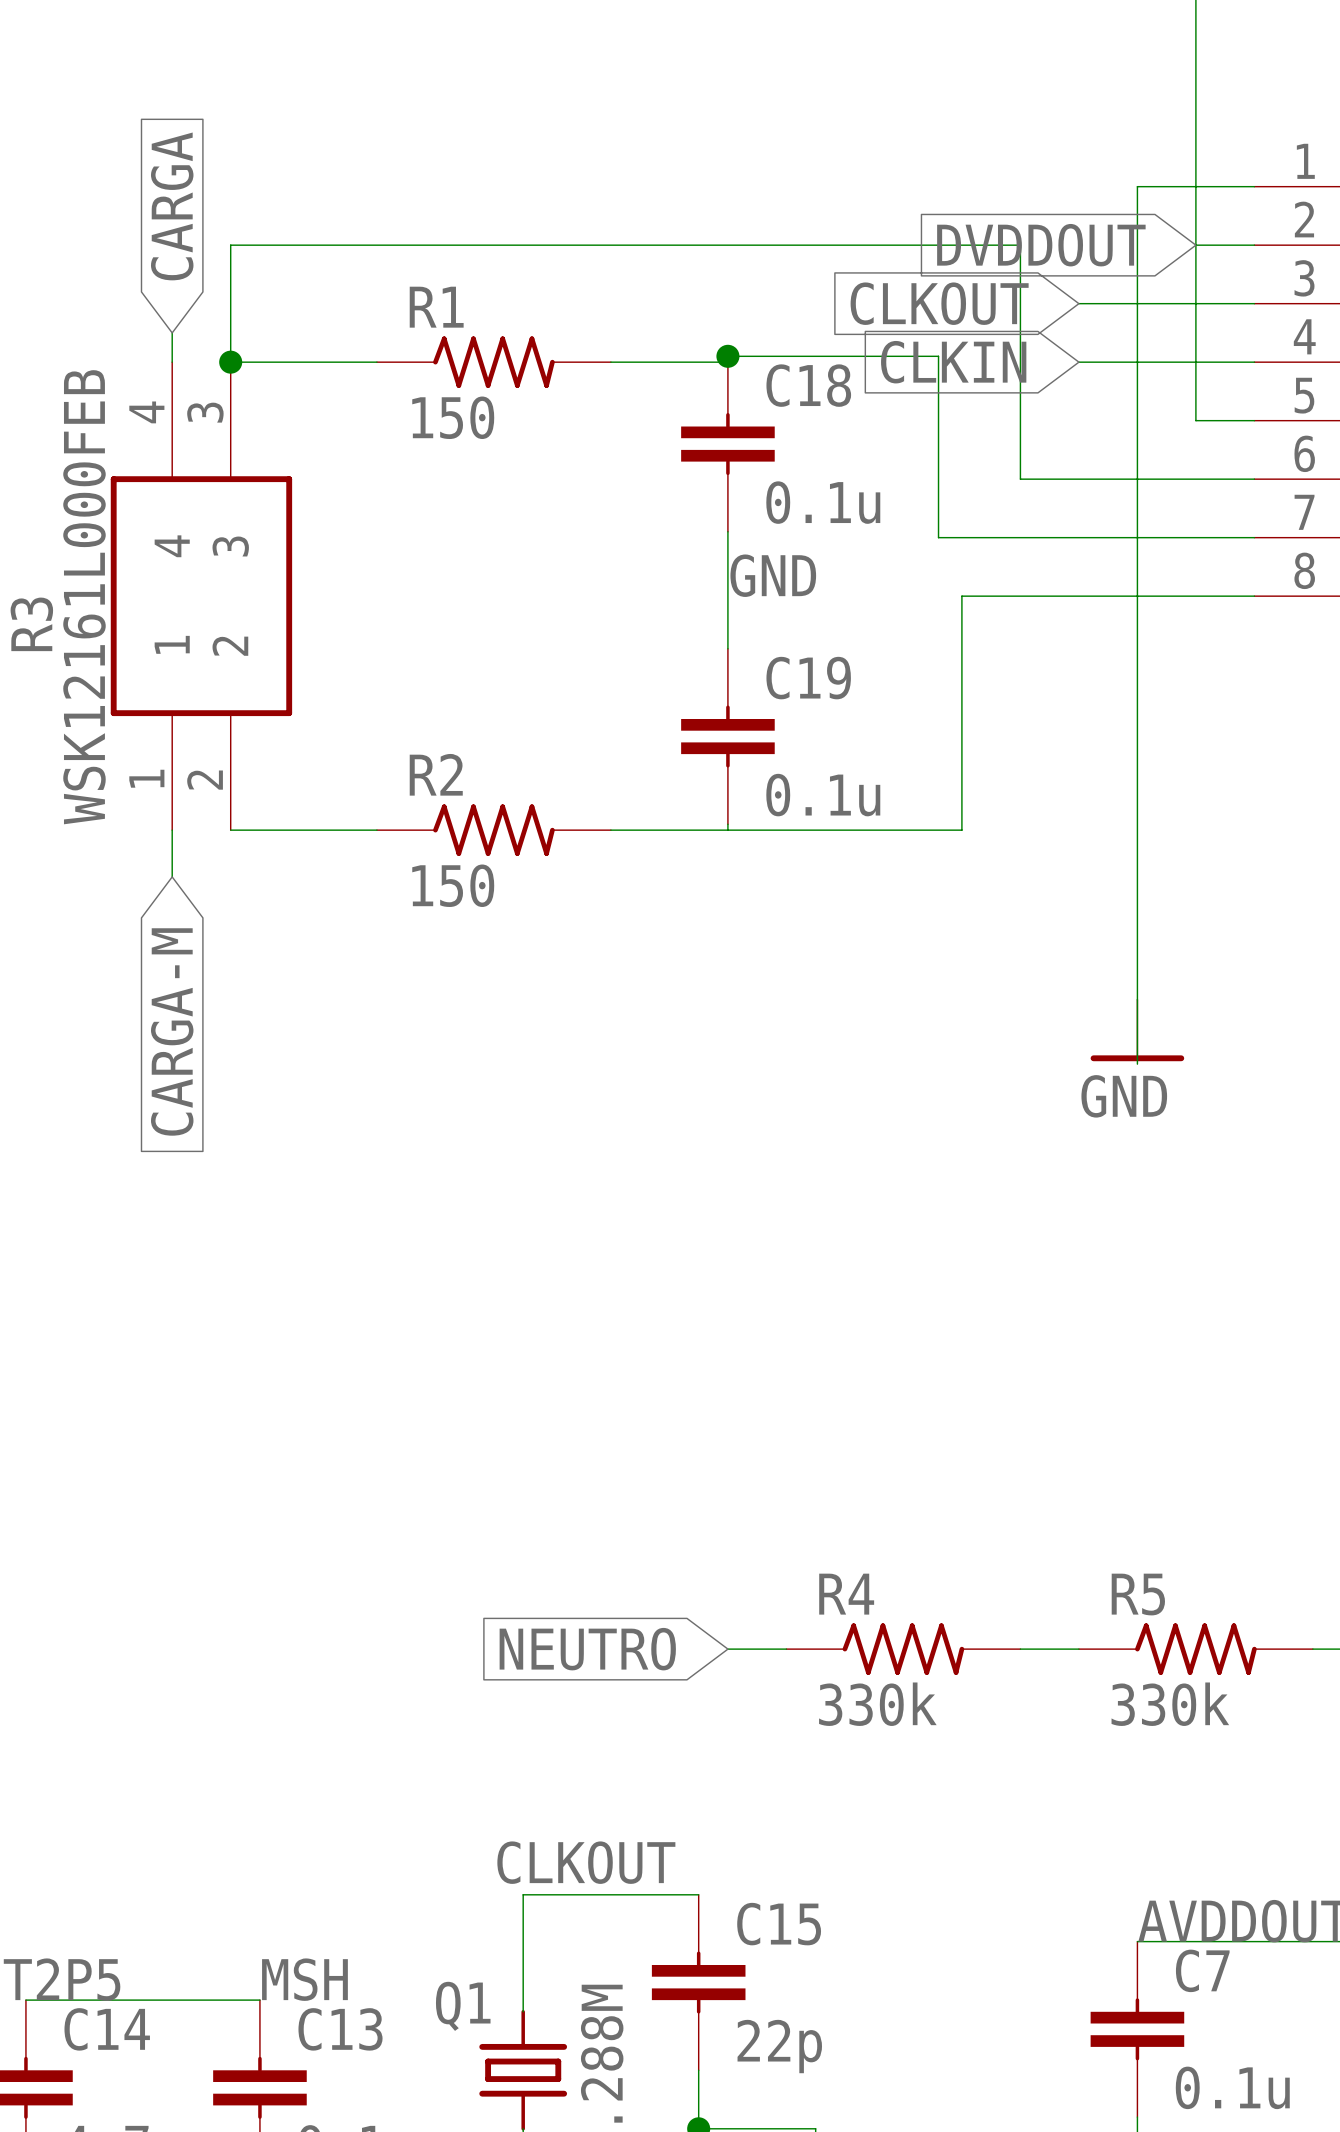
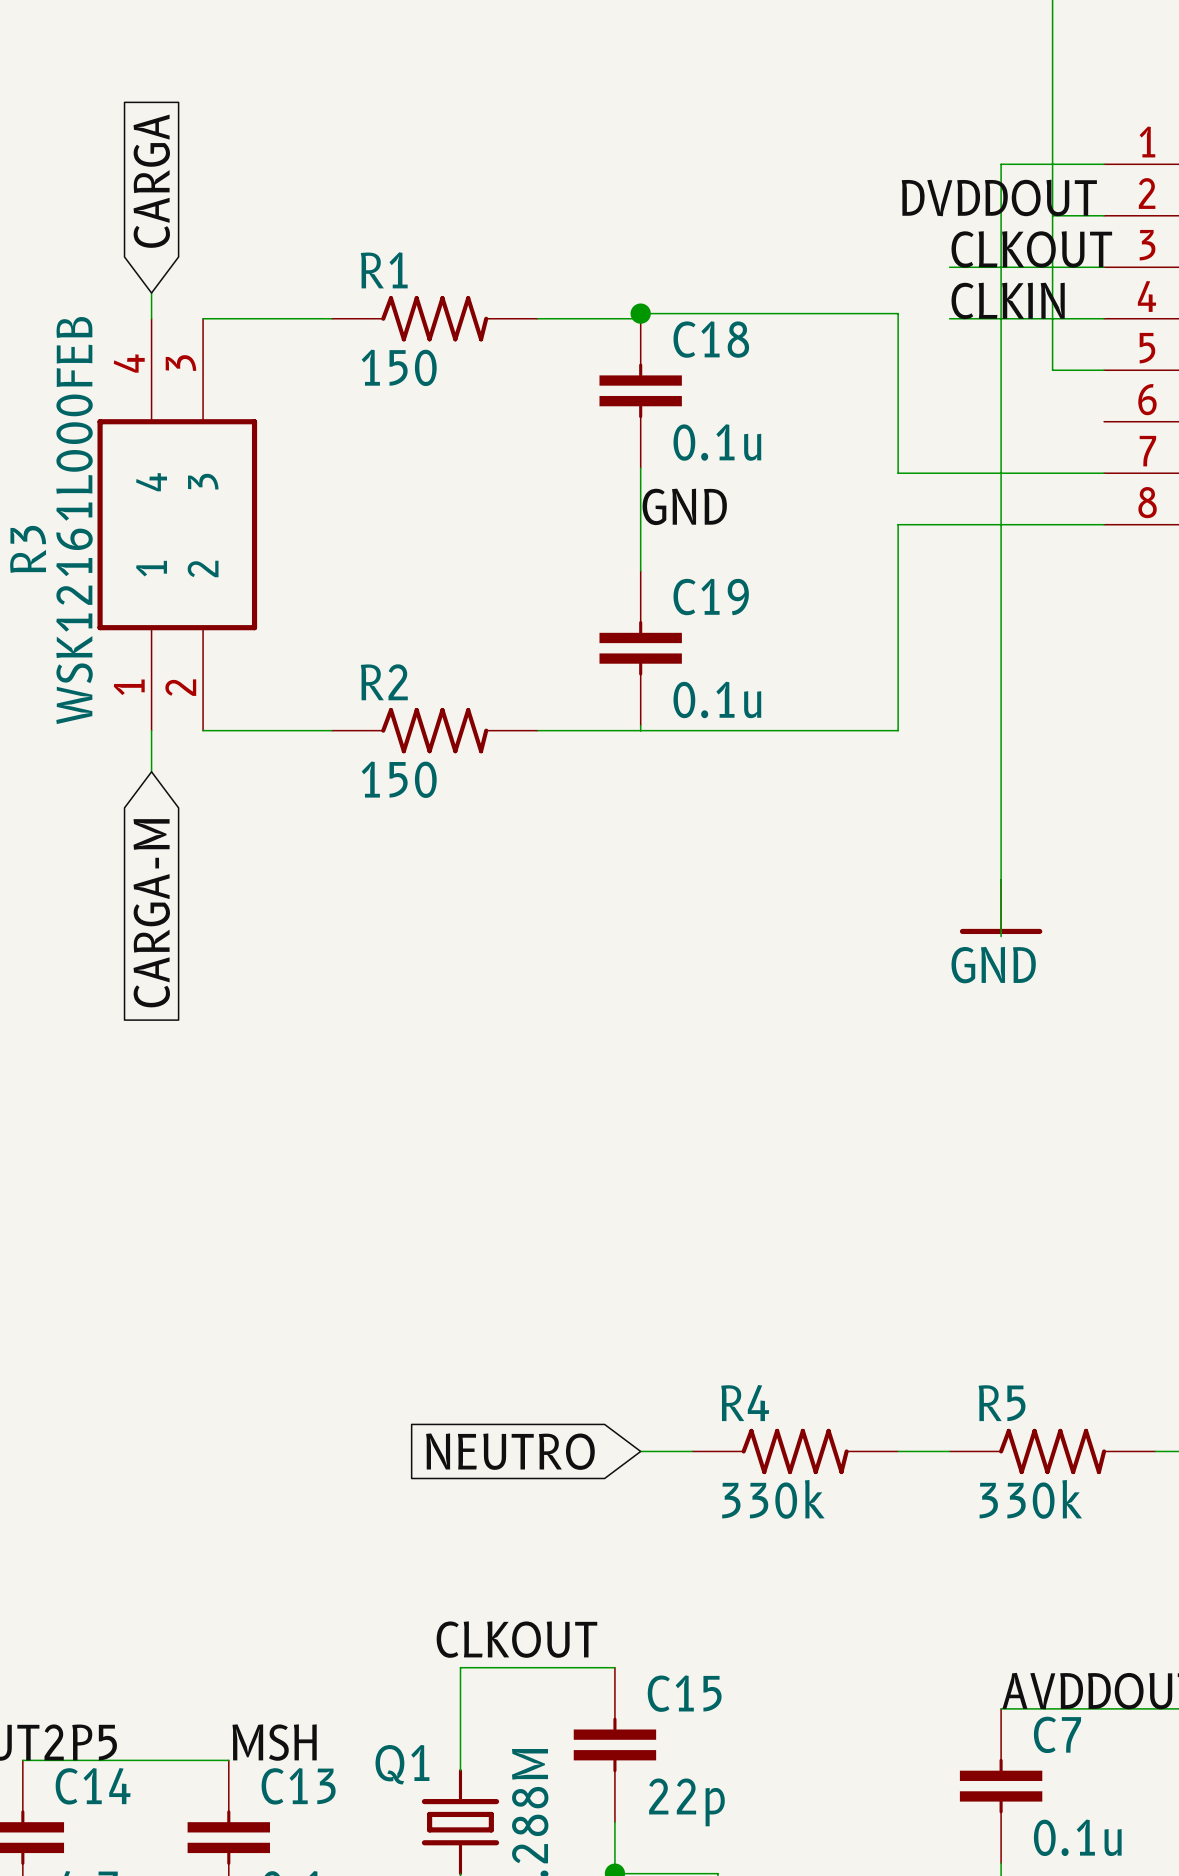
label: none -> DVDDOUT (999, 198)
global label: DVDDOUT (1041, 245) -> none
label: none -> CLKOUT (1031, 249)
global label: CLKOUT (939, 303) -> none
label: none -> CLKIN (1008, 300)
wire: (938, 356) (938, 537) (1020, 537) -> (898, 421) (898, 473)
wire: (1020, 356) (1020, 245) (230, 245) (230, 362) -> (898, 313) (826, 313)
junction: (230, 362) -> none
global label: CLKIN (953, 362) -> none
wire: (1020, 479) (1254, 479) -> none
wire: (1020, 596) (961, 596) (961, 830) -> (898, 524) (898, 730) (846, 730)

